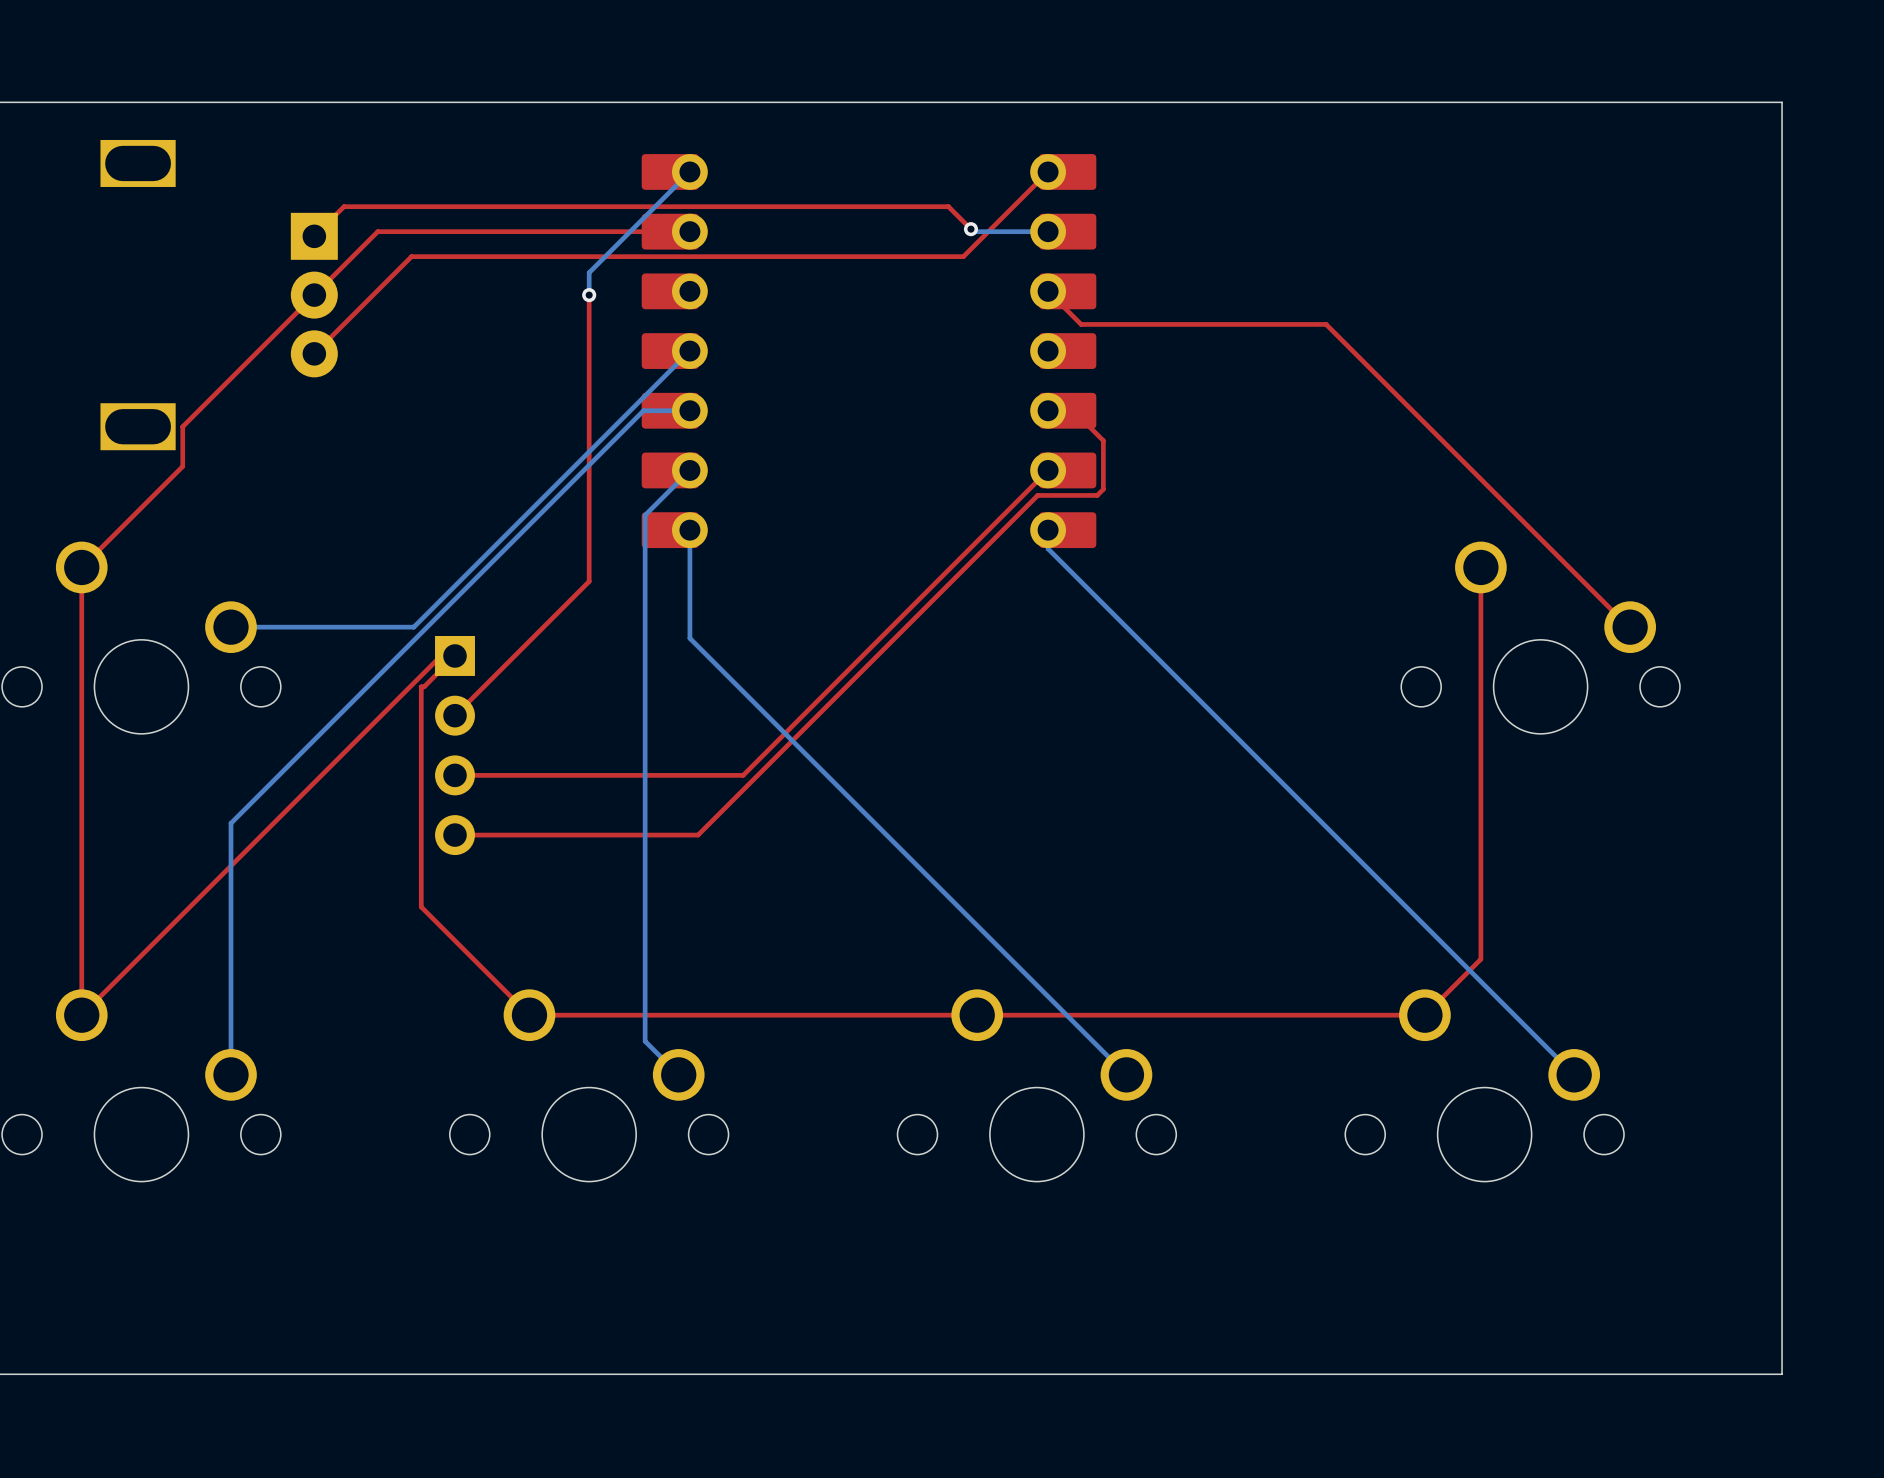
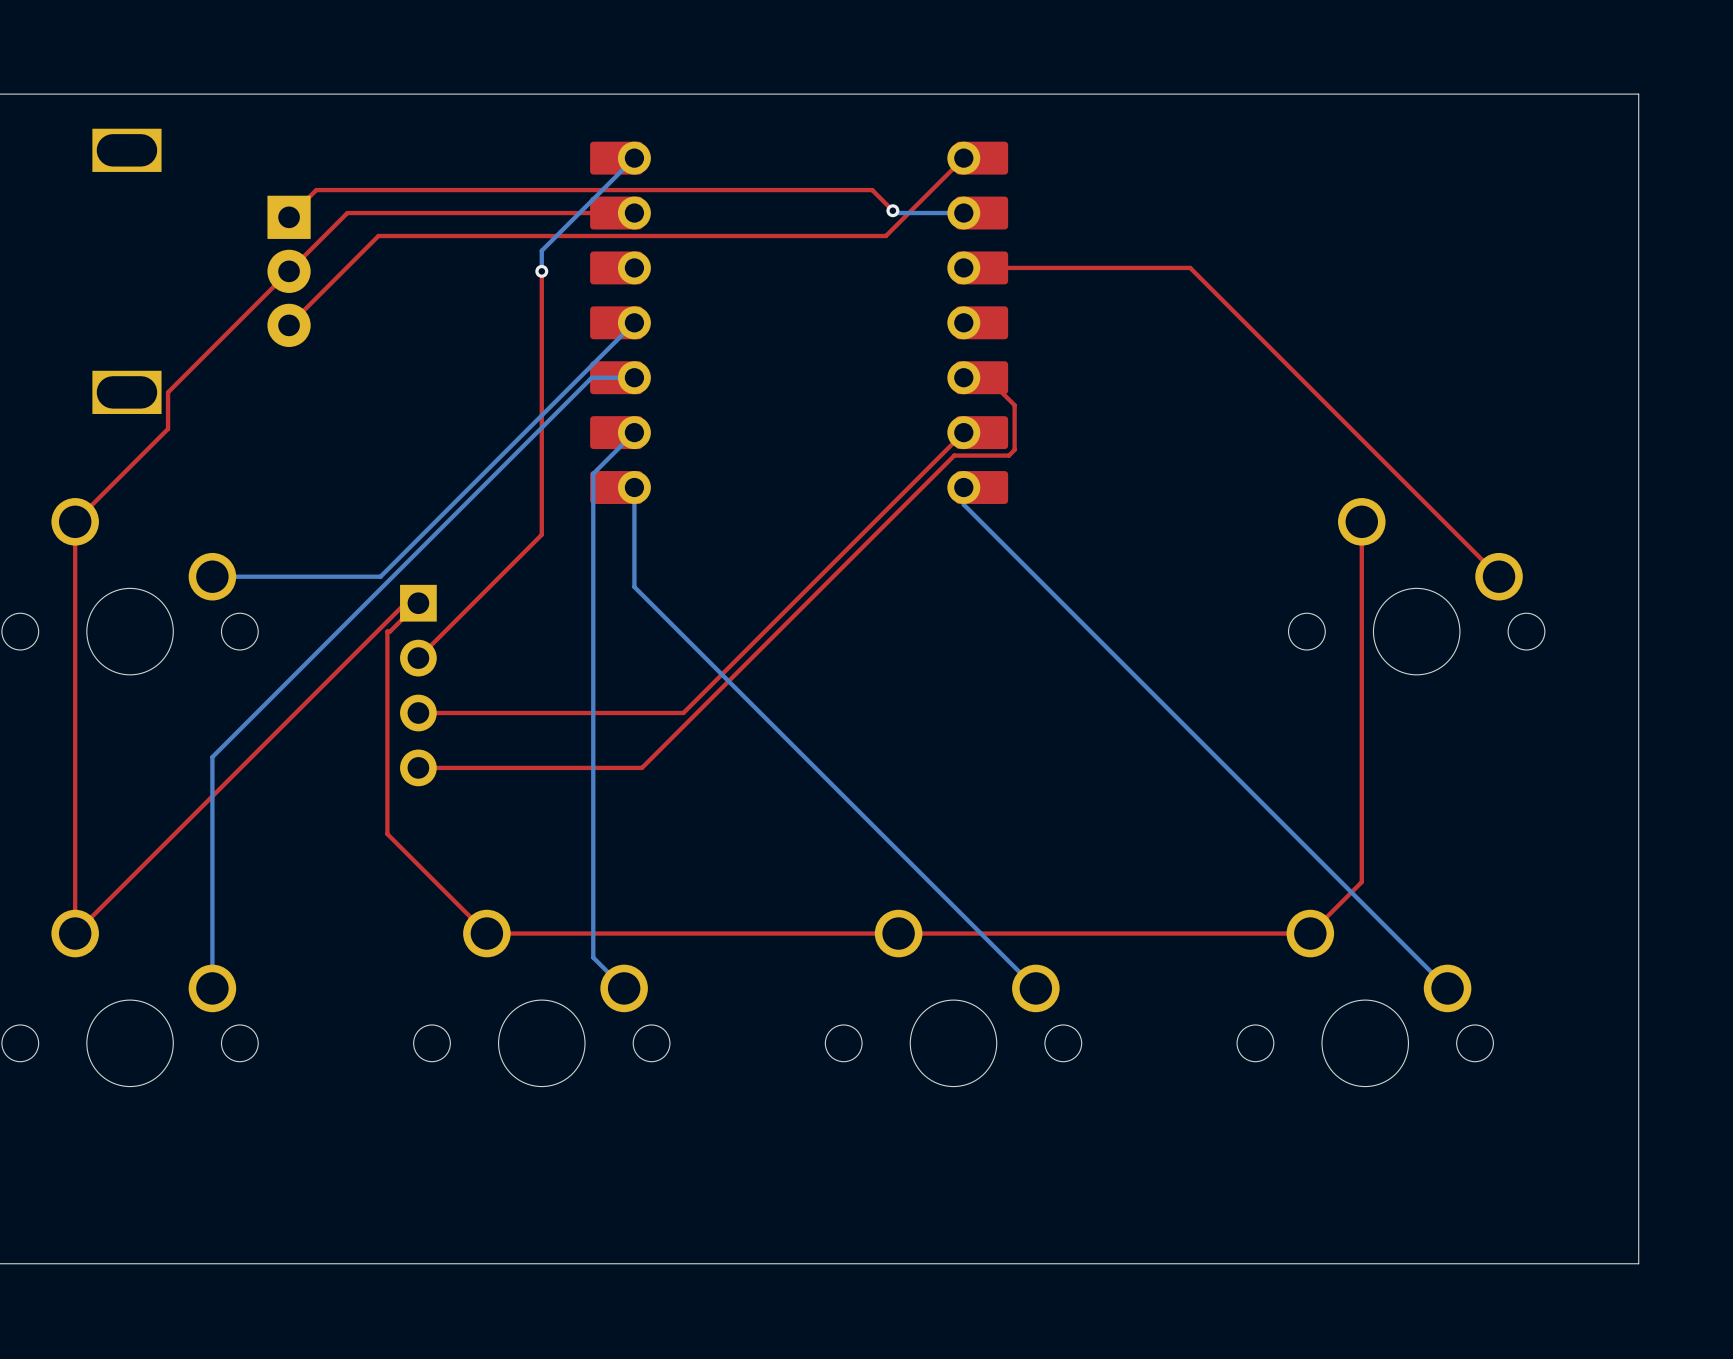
top track: (1048, 291) (1081, 324) (1326, 324) (1630, 627) -> (963, 267) (1190, 267) (1499, 576)

